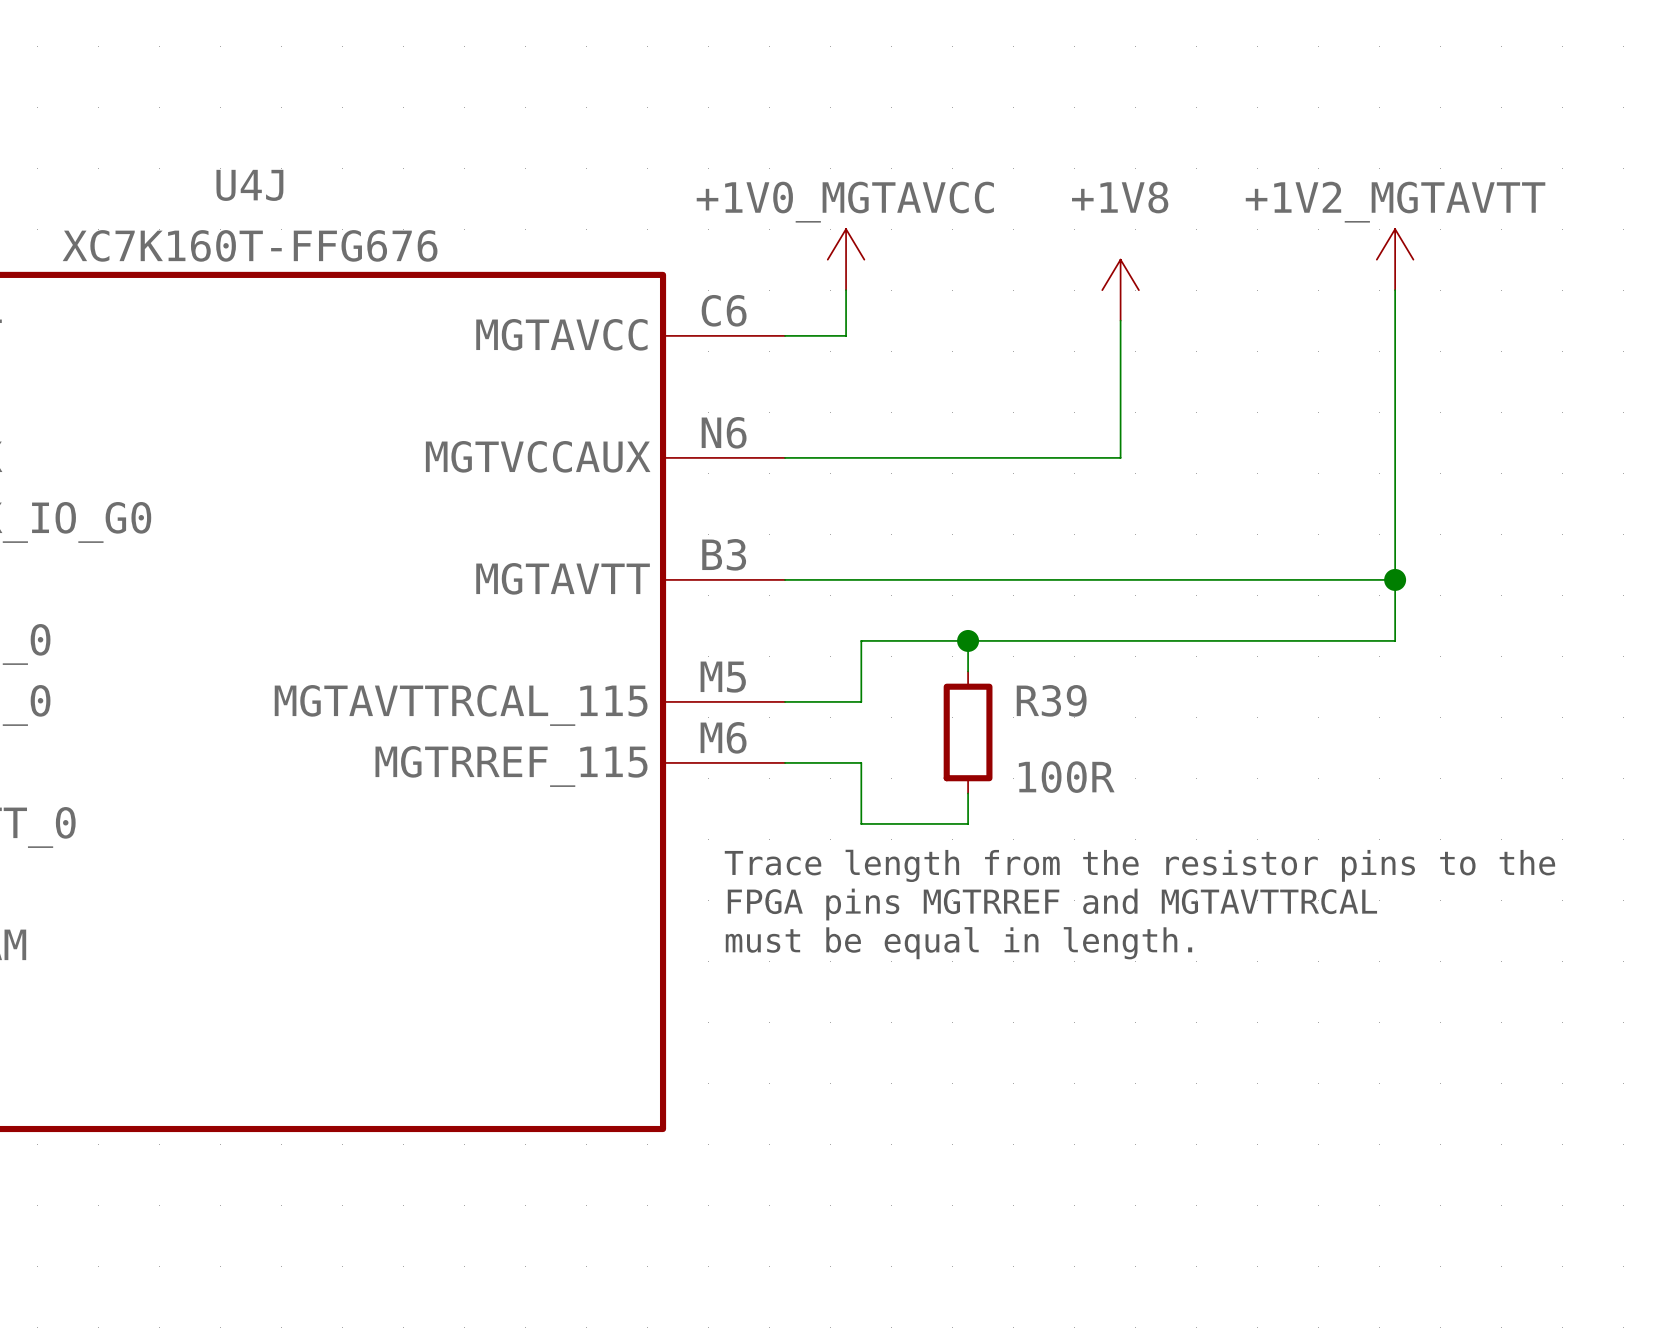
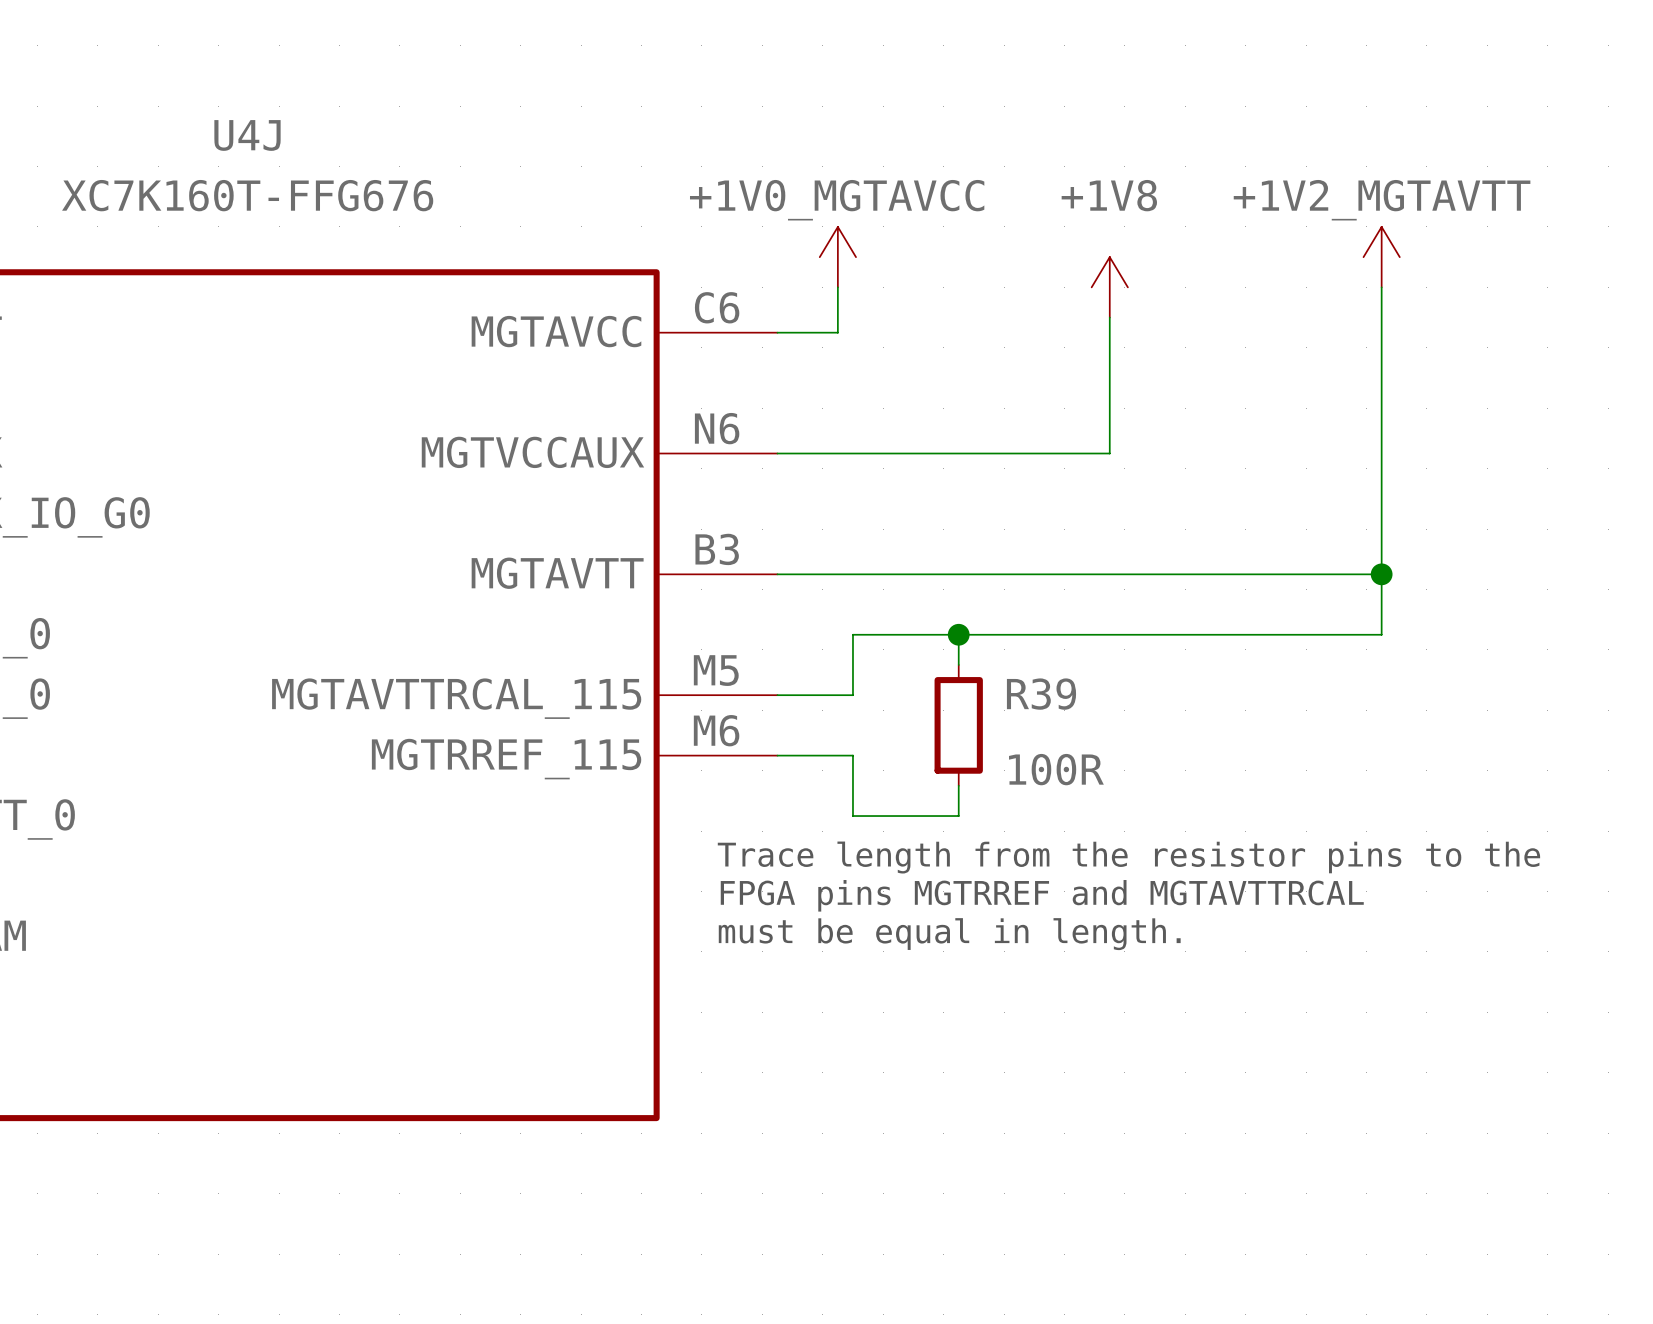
U4J name position: U4J (249, 185) -> U4J (247, 135)
U4J value position: XC7K160T-FFG676 (250, 245) -> XC7K160T-FFG676 (247, 195)

